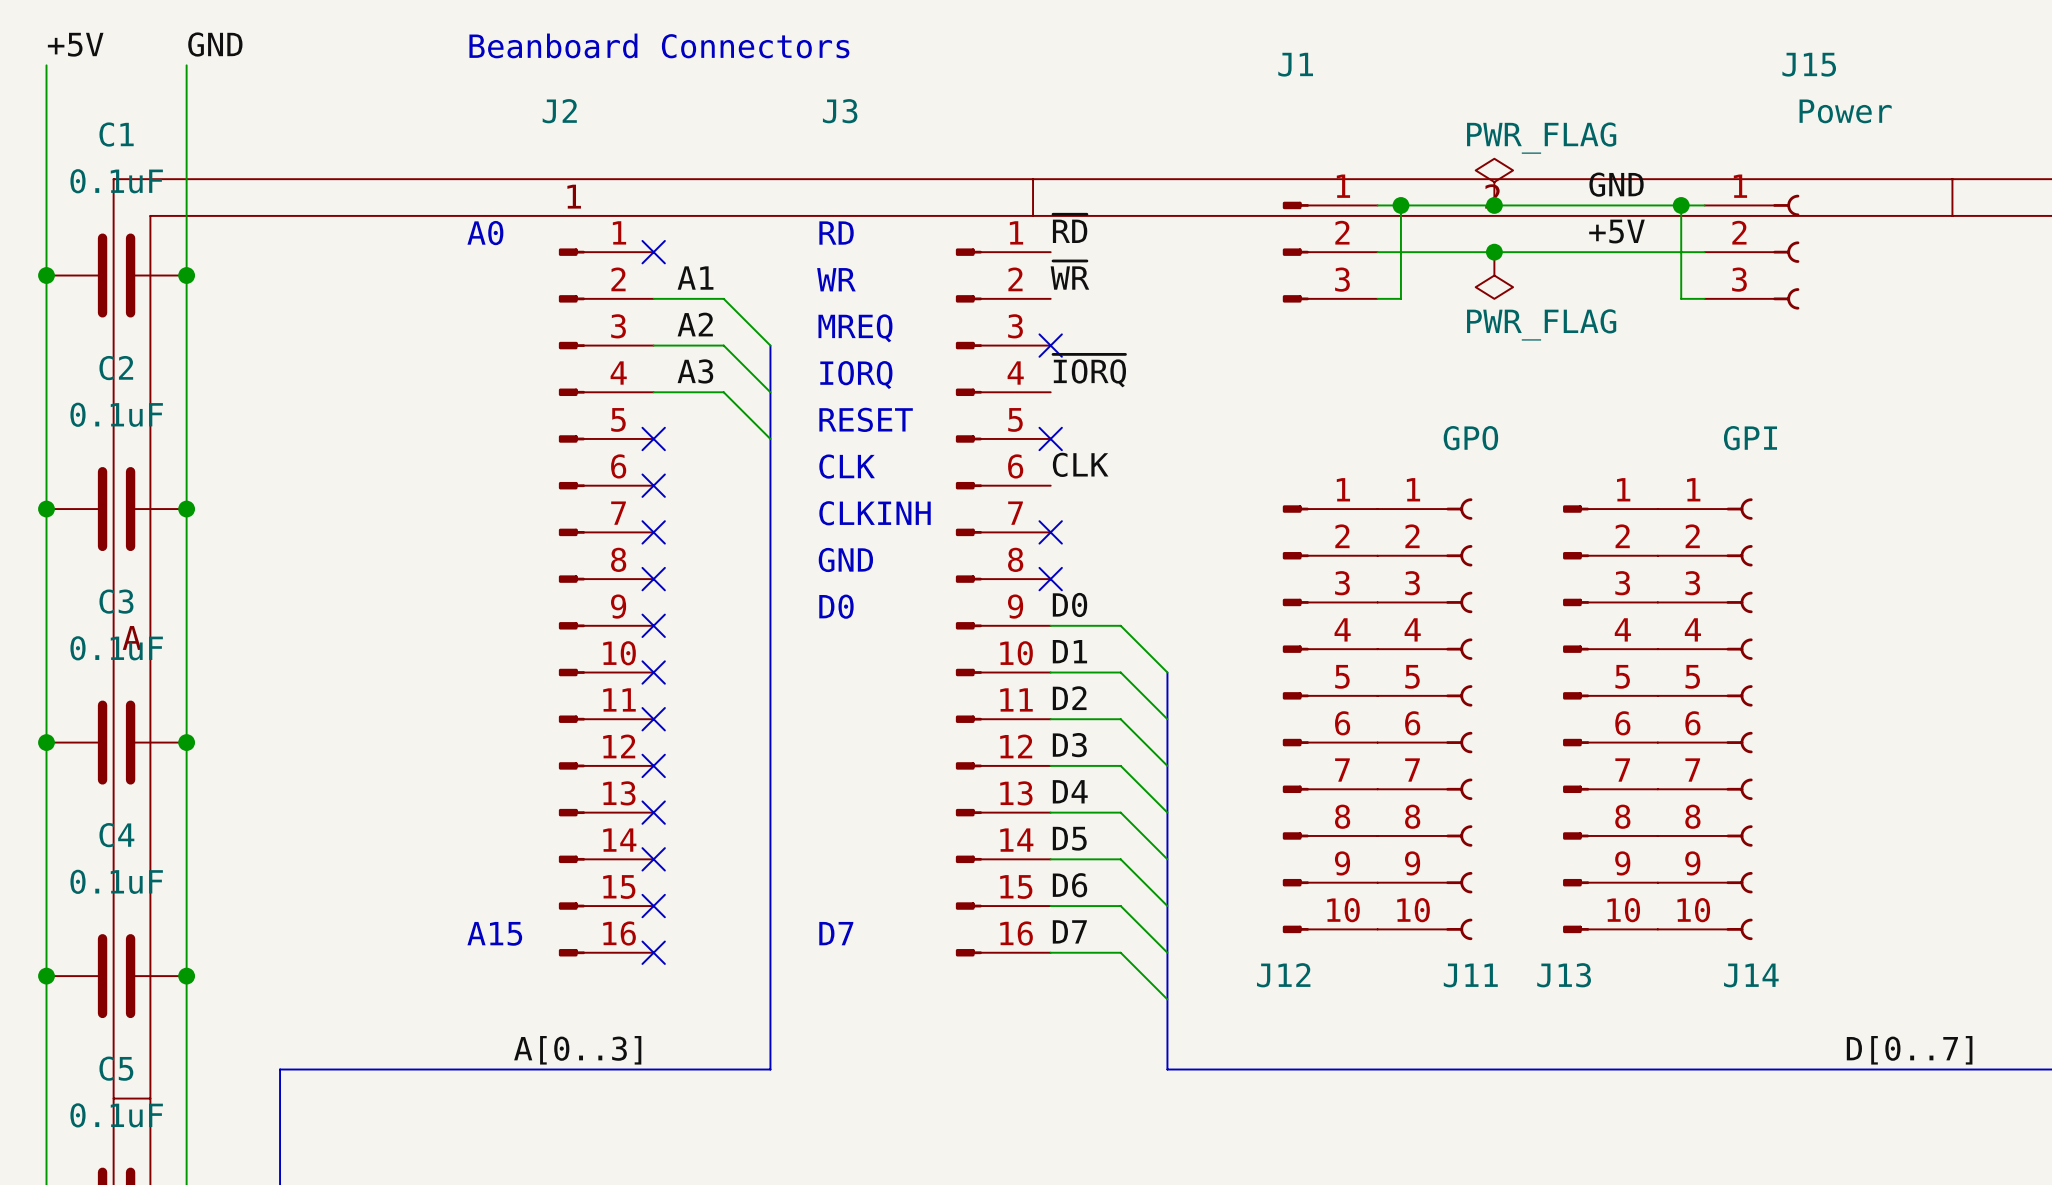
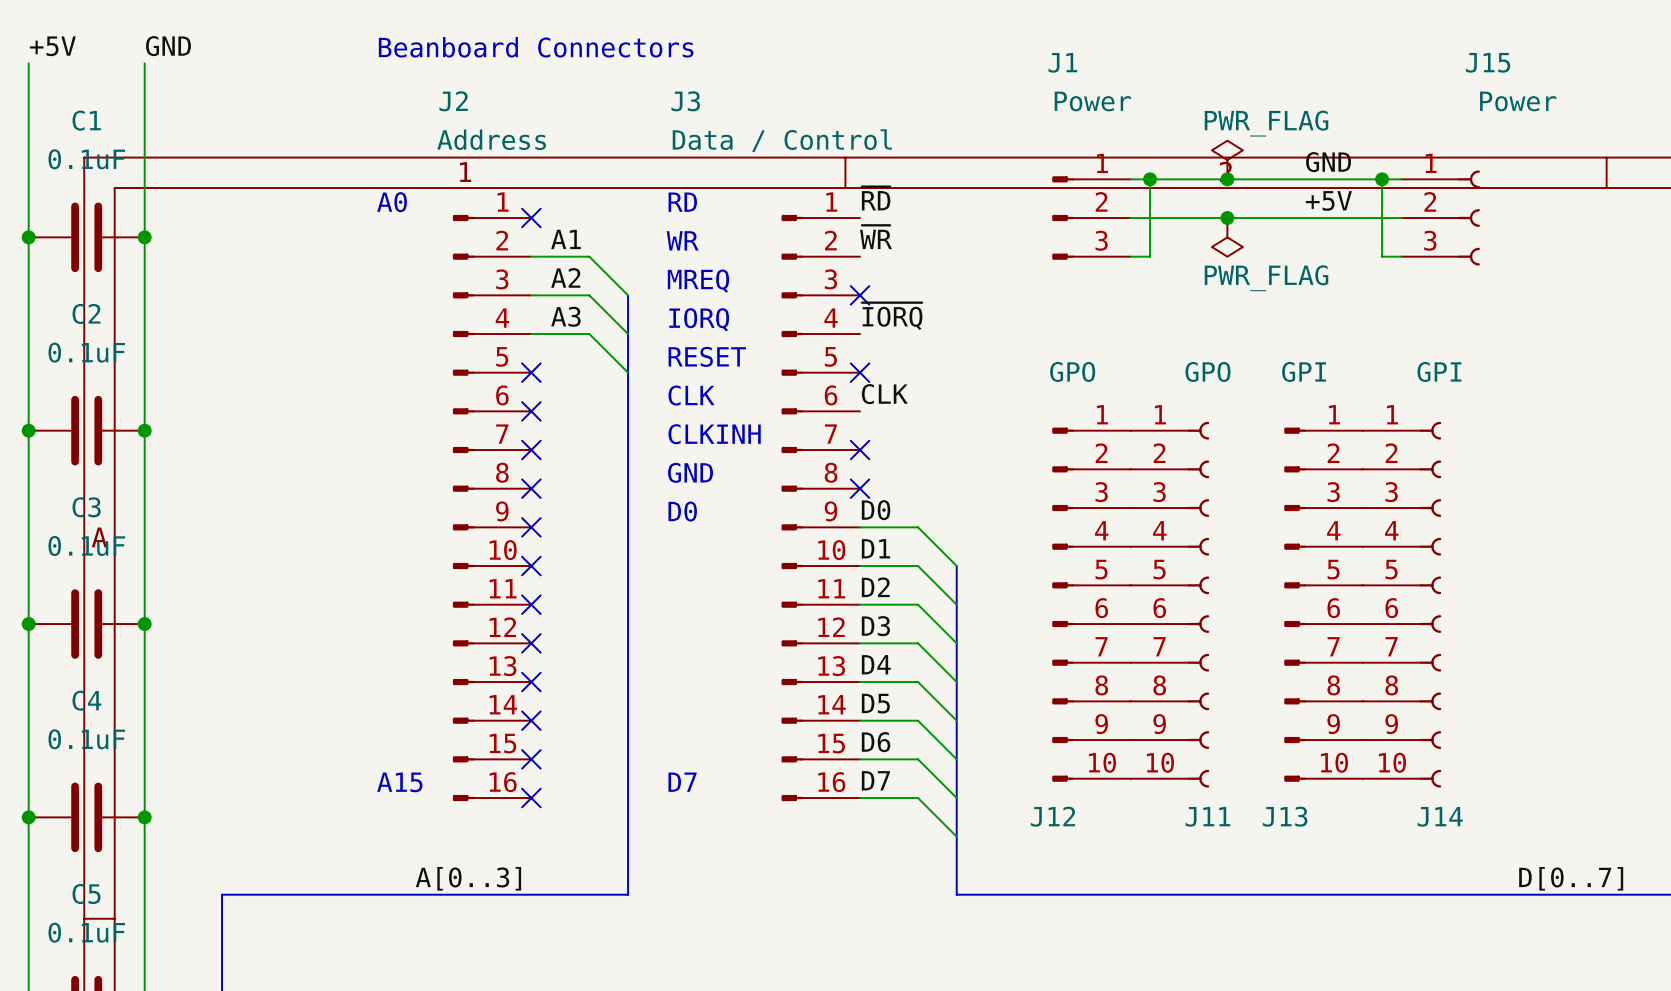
J1 value: none -> Power (1092, 101)
J2 value: none -> Address (491, 139)
J3 value: none -> Data / Control (782, 140)
J12 value: none -> GPO (1072, 371)
J13 value: none -> GPI (1304, 371)

